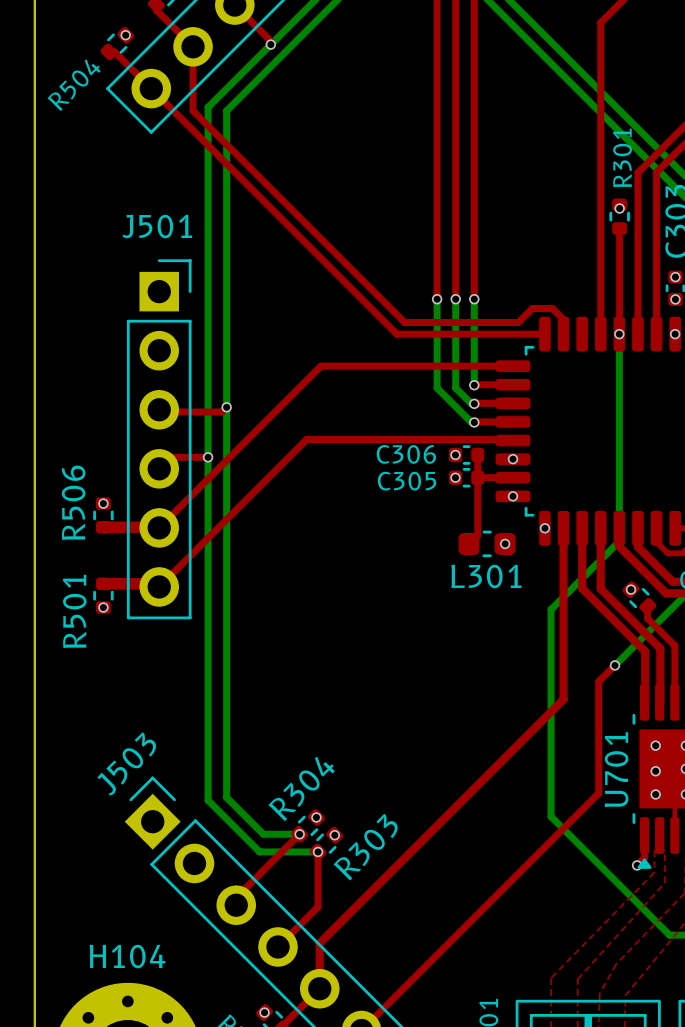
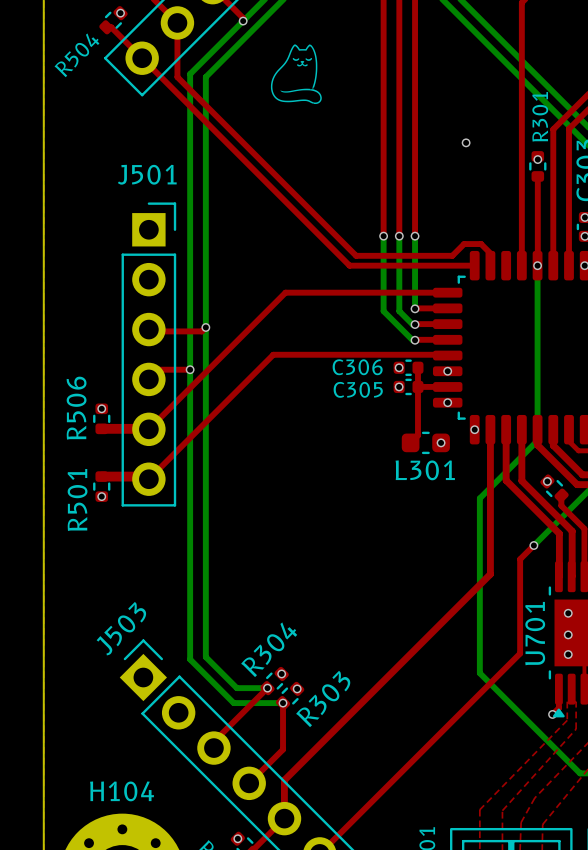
drawing: none -> [270, 44, 322, 105]
via: none -> (466, 142)

